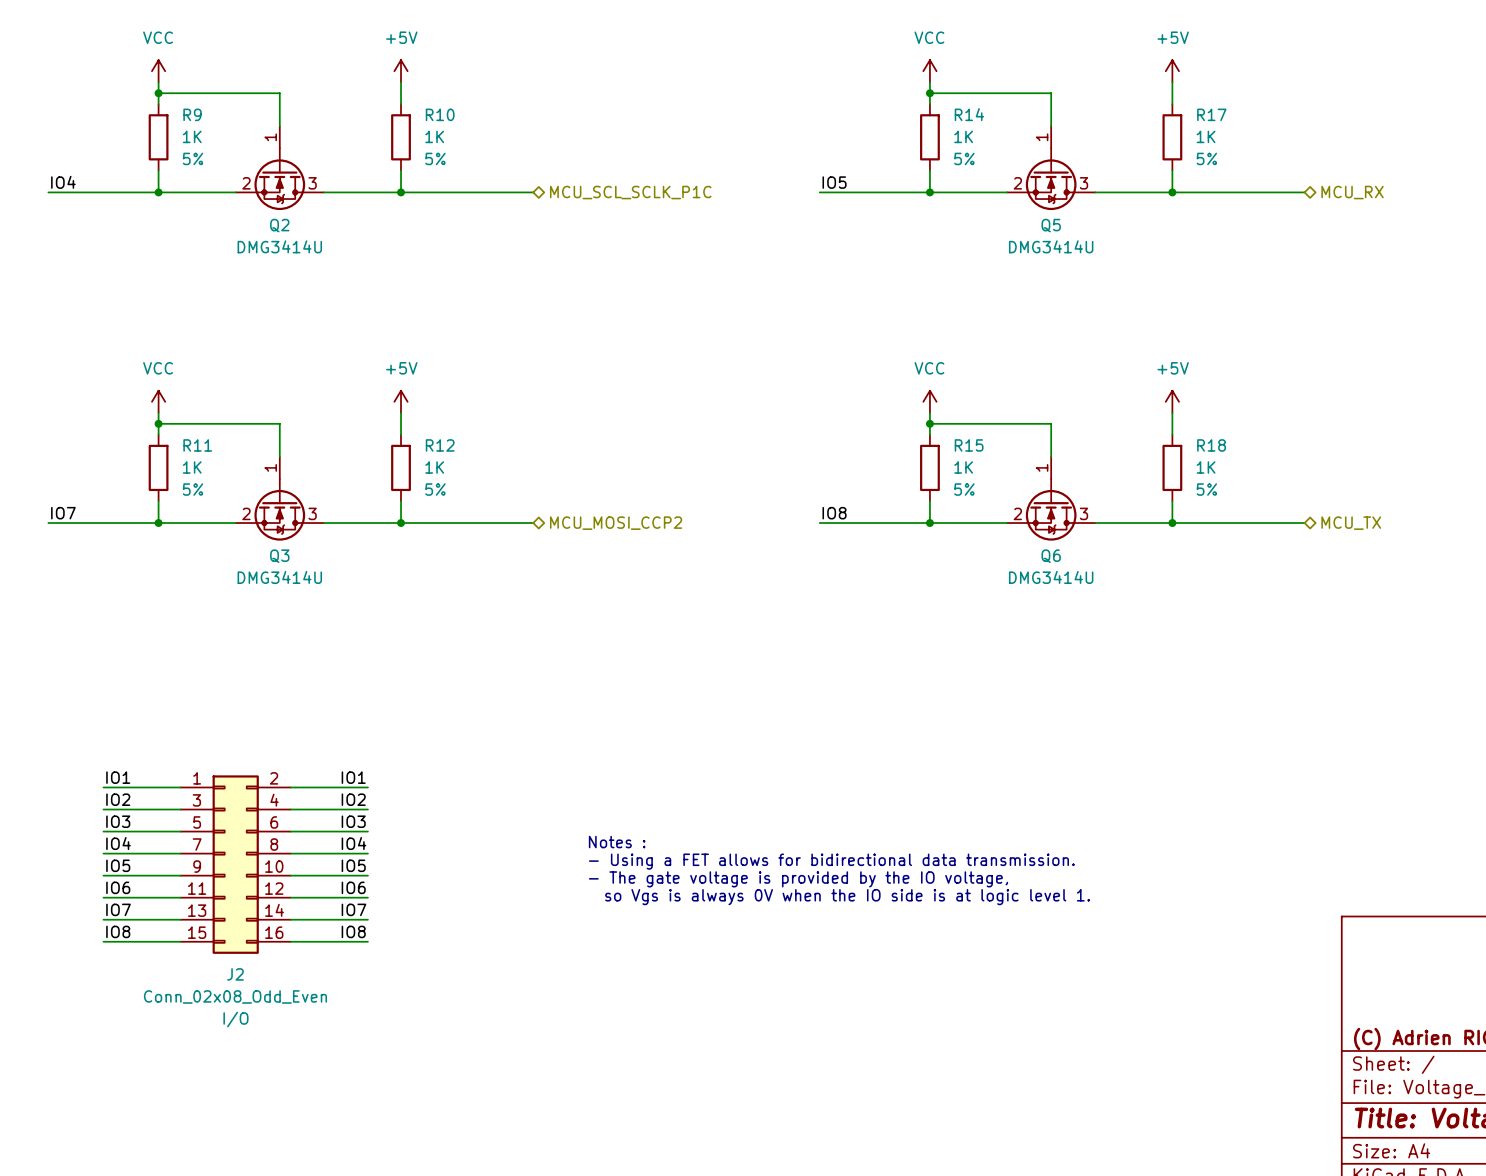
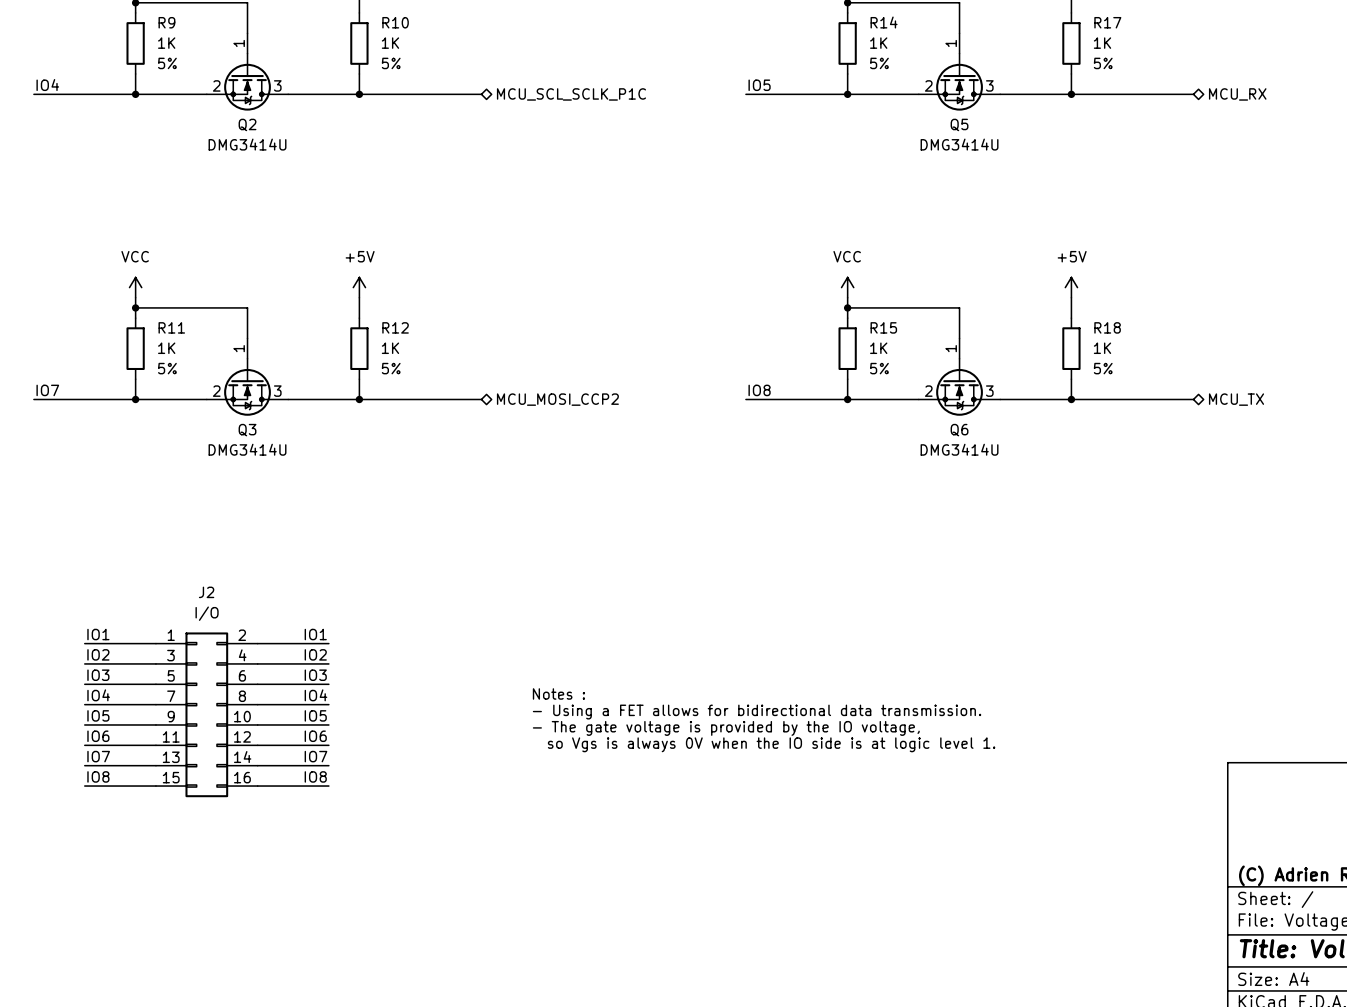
J2 name position: J2 (235, 974) -> J2 (206, 592)
J2 value: Conn_02x08_Odd_Even (235, 996) -> I/O (207, 613)
J2 text: I/O (235, 1019) -> none

